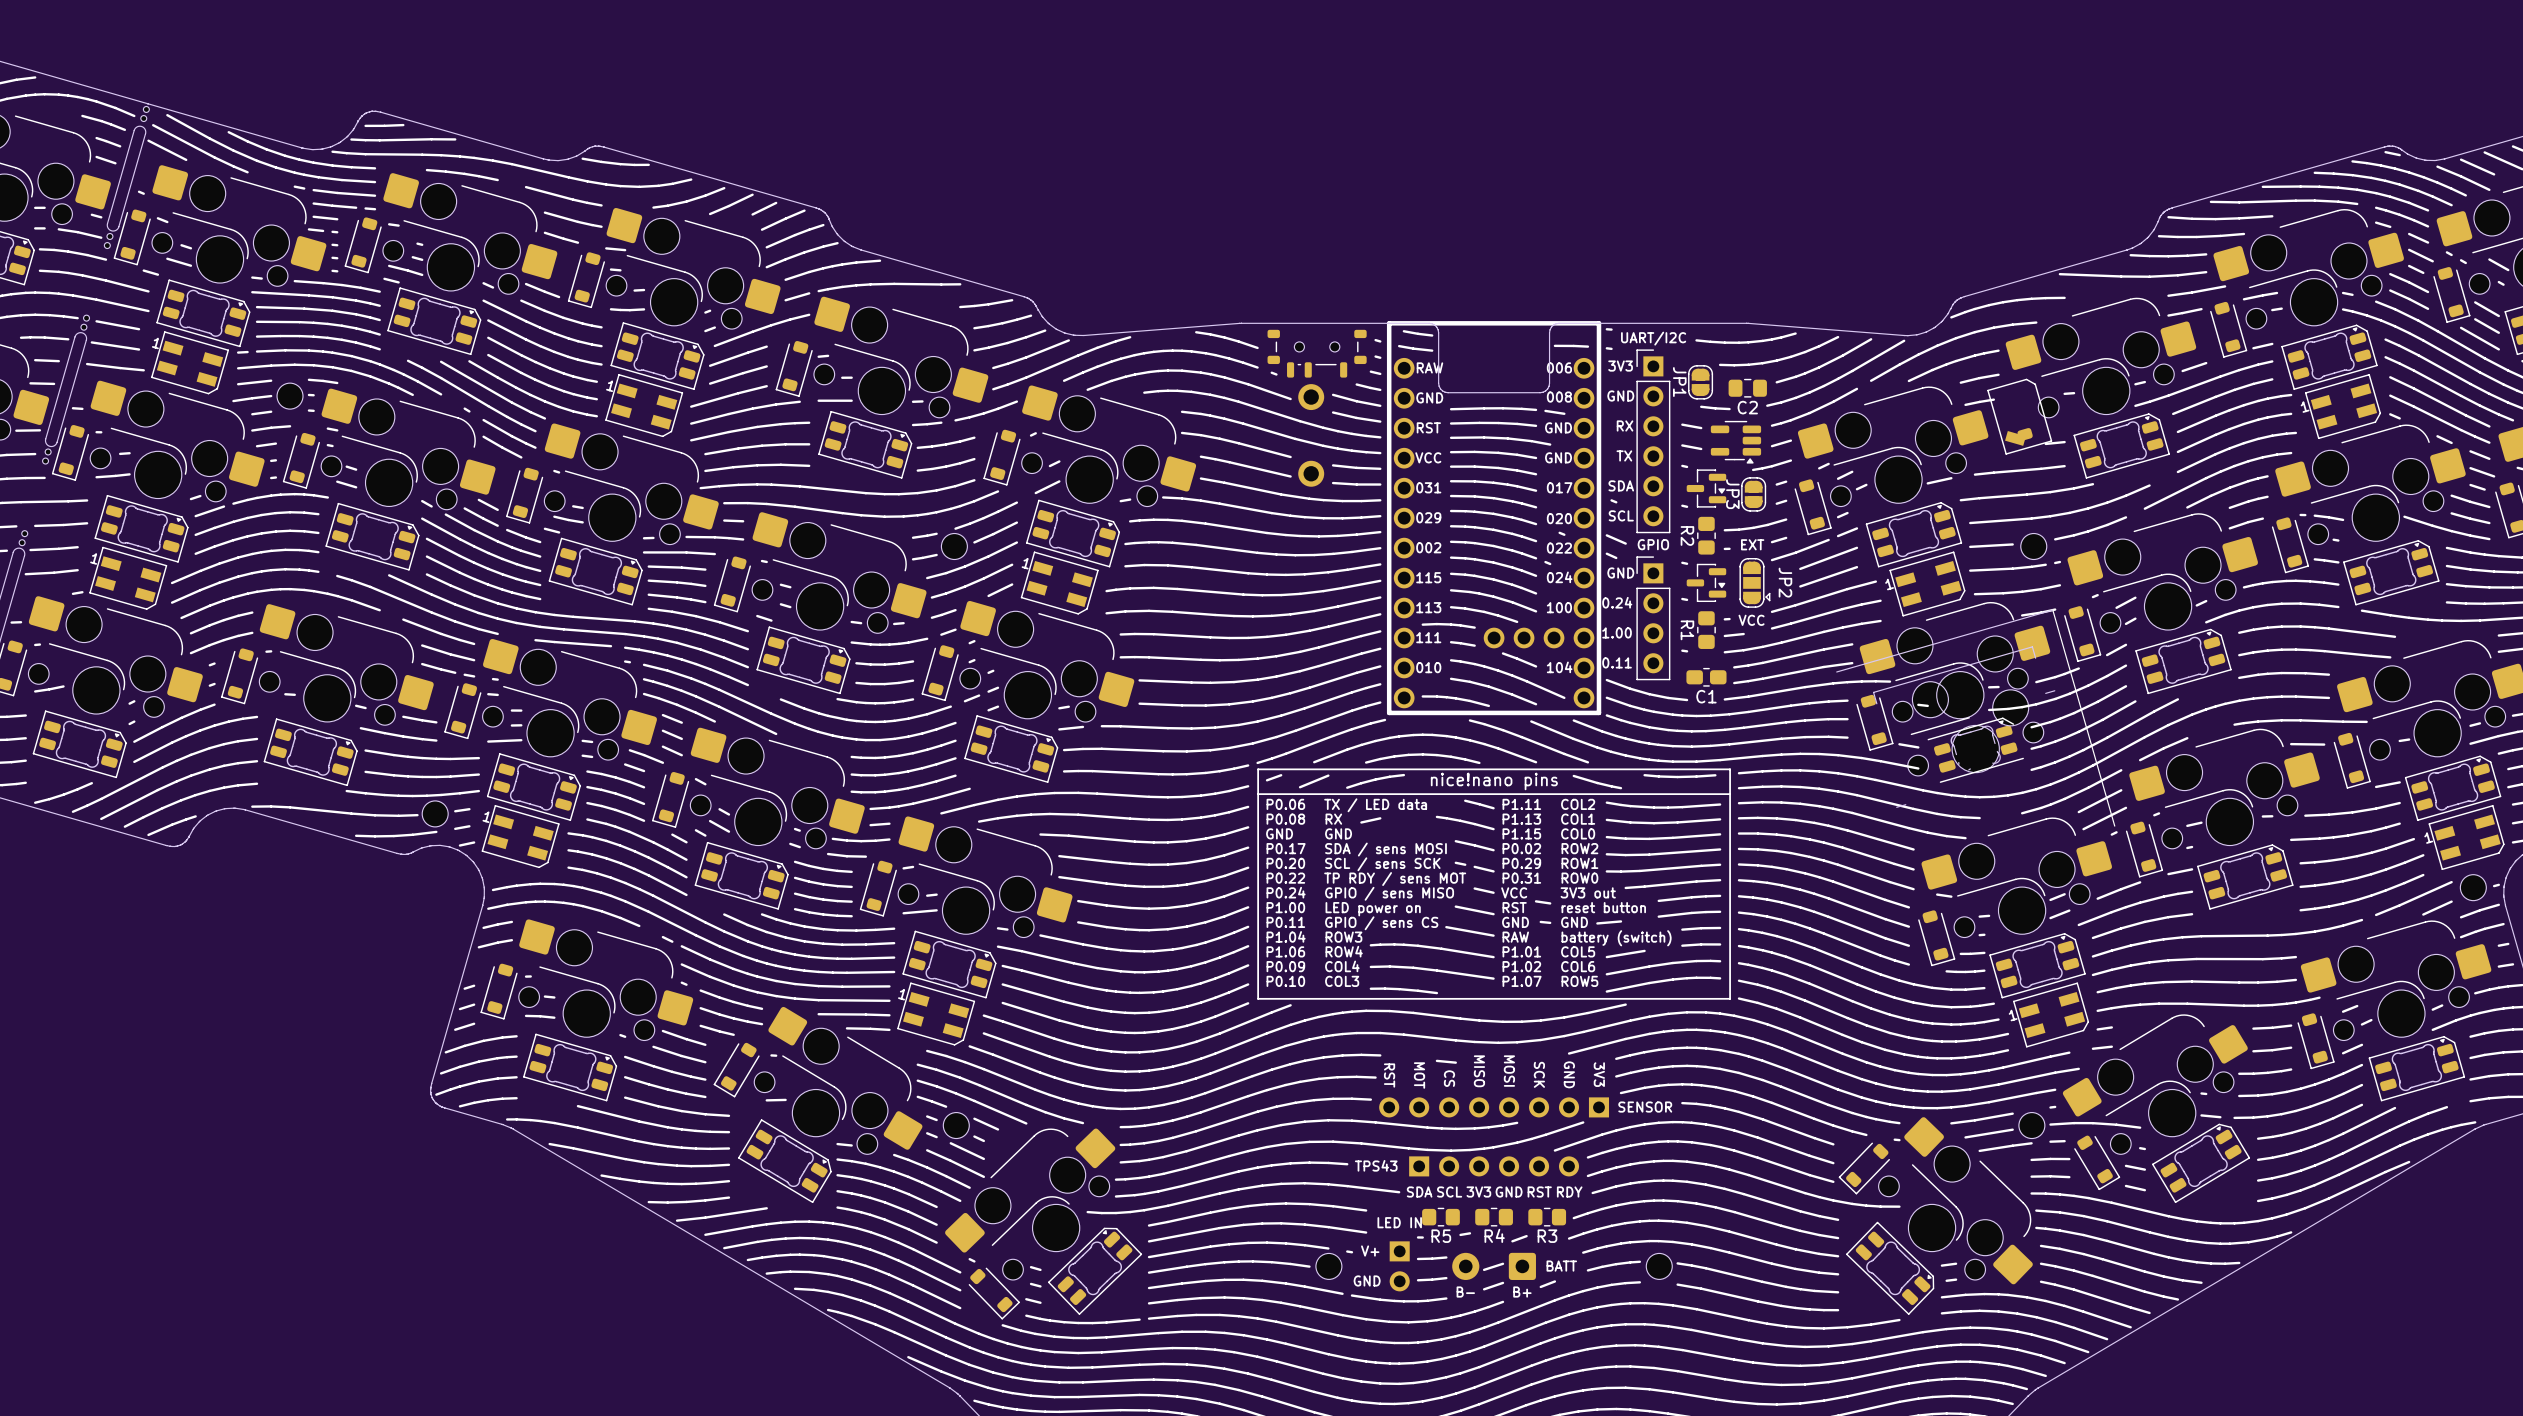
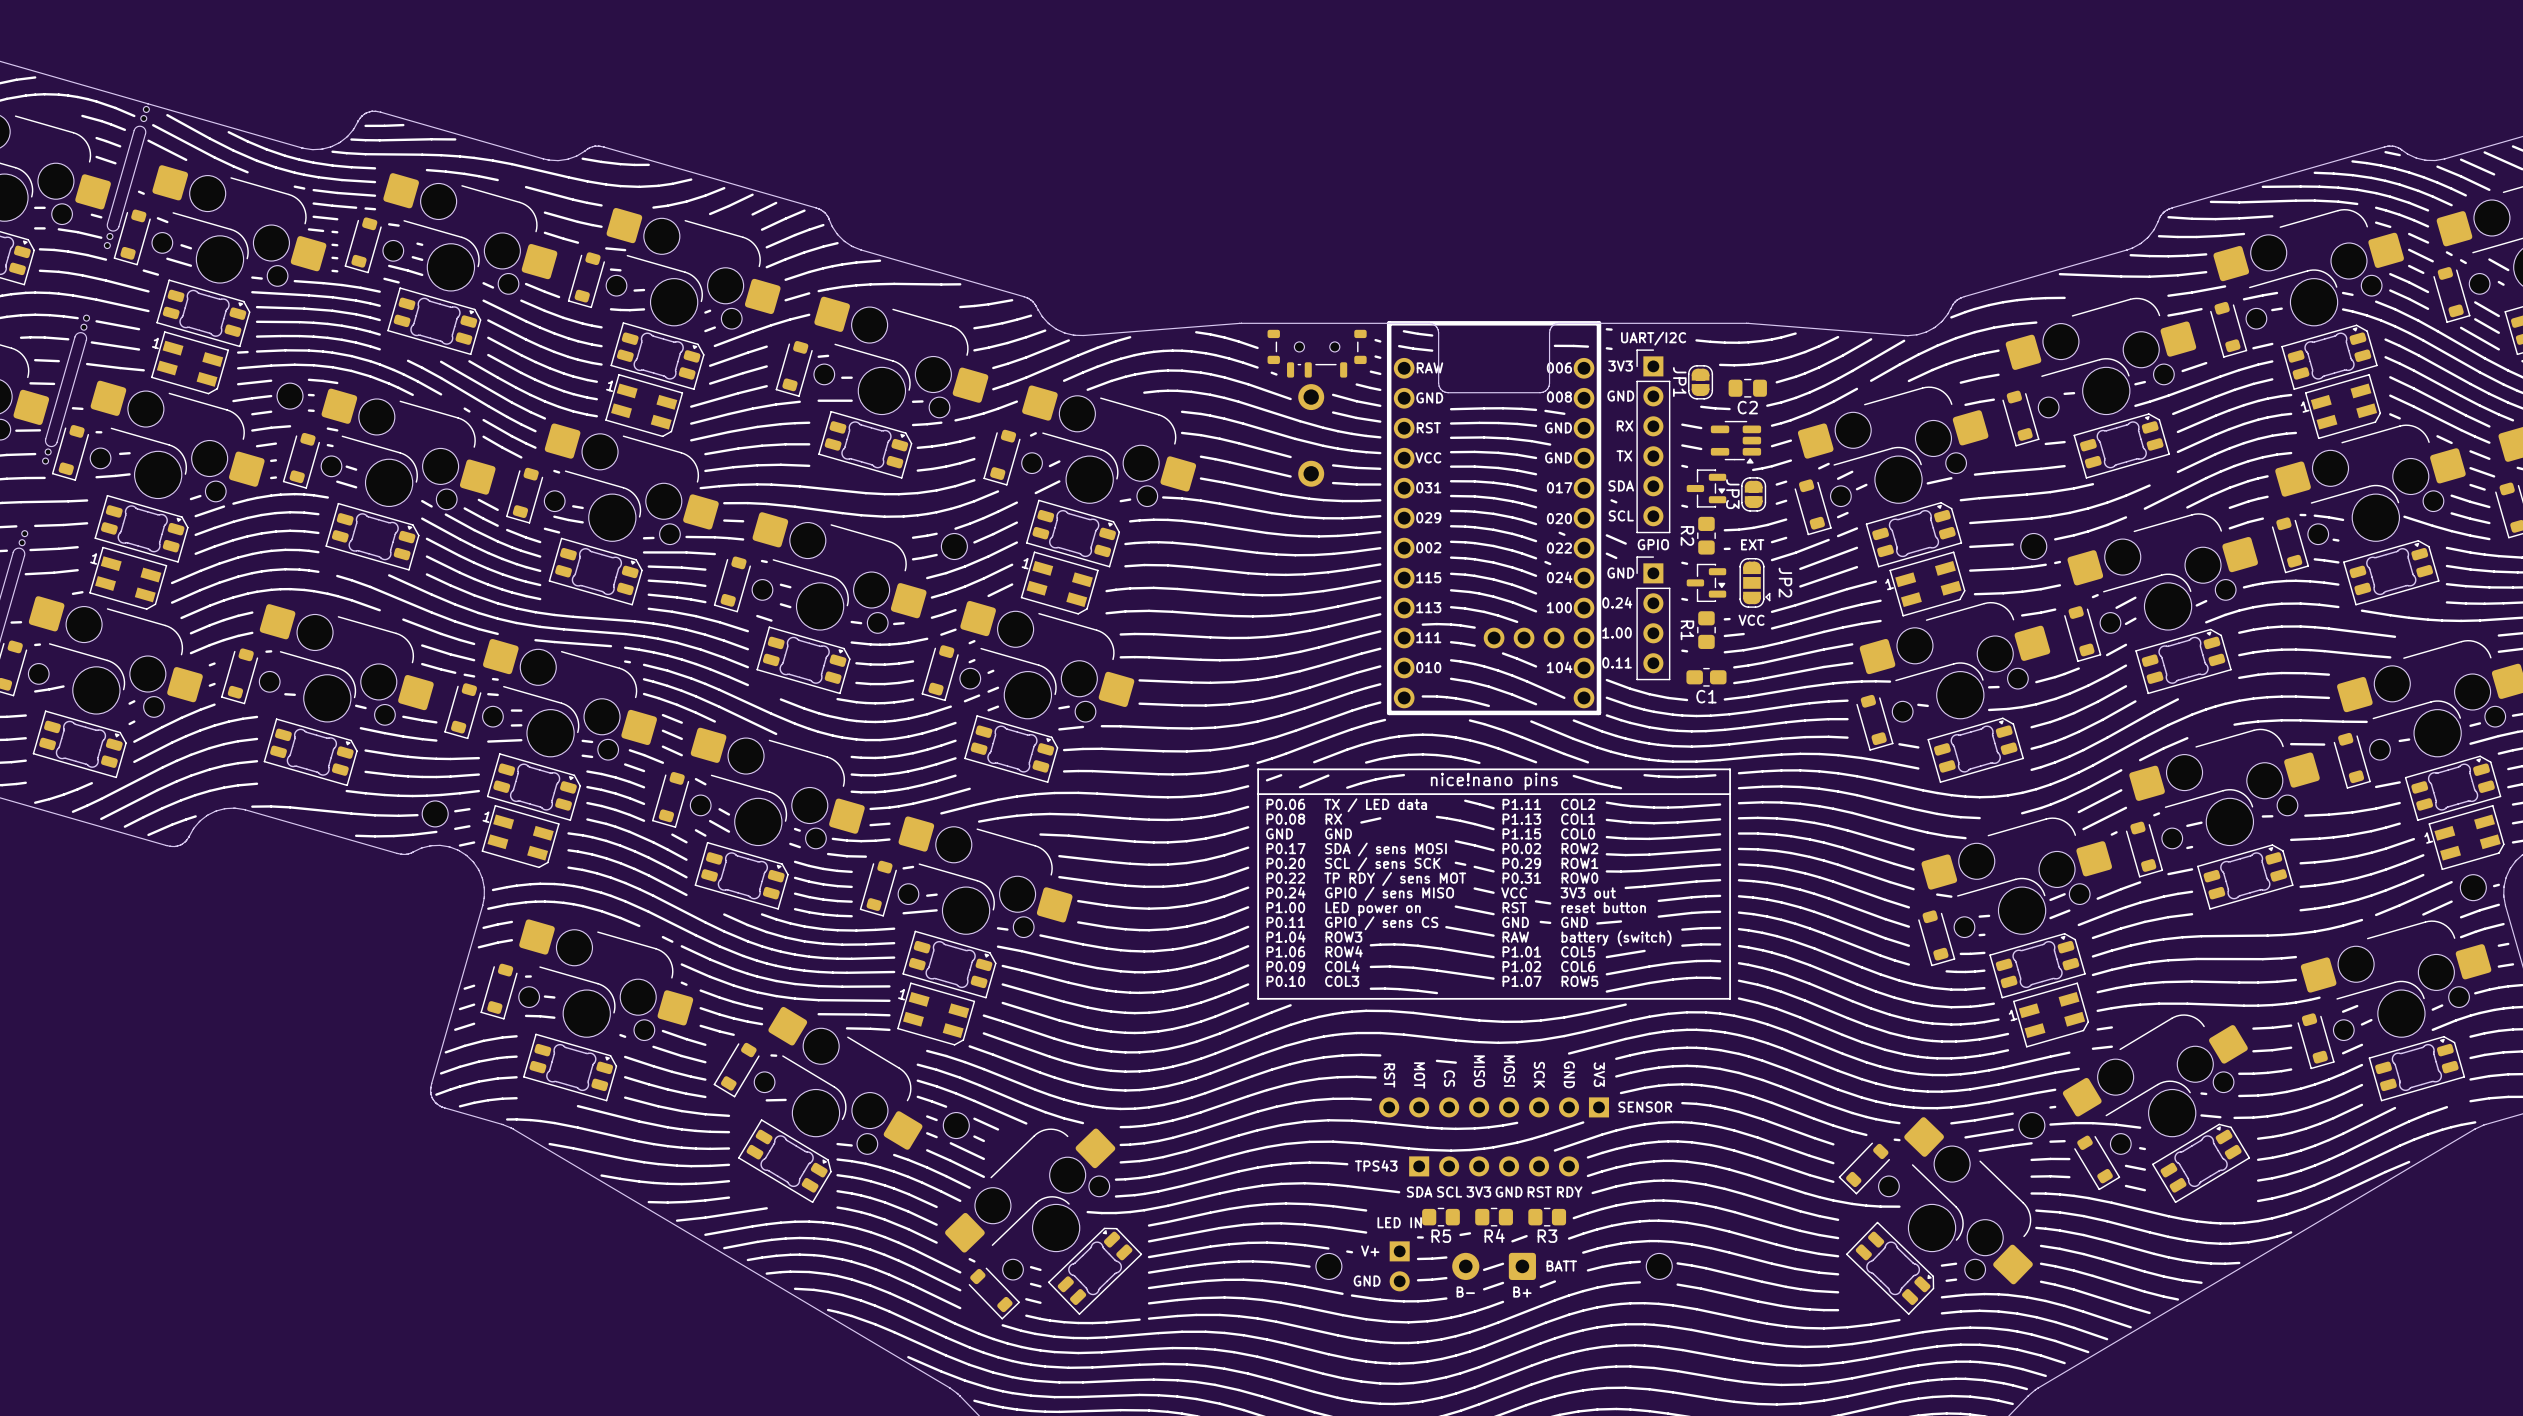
part footprint: [1987, 378, 2053, 455] -> [2002, 390, 2040, 447]
part: (1975, 718) -> none
part: none -> (1975, 750)

